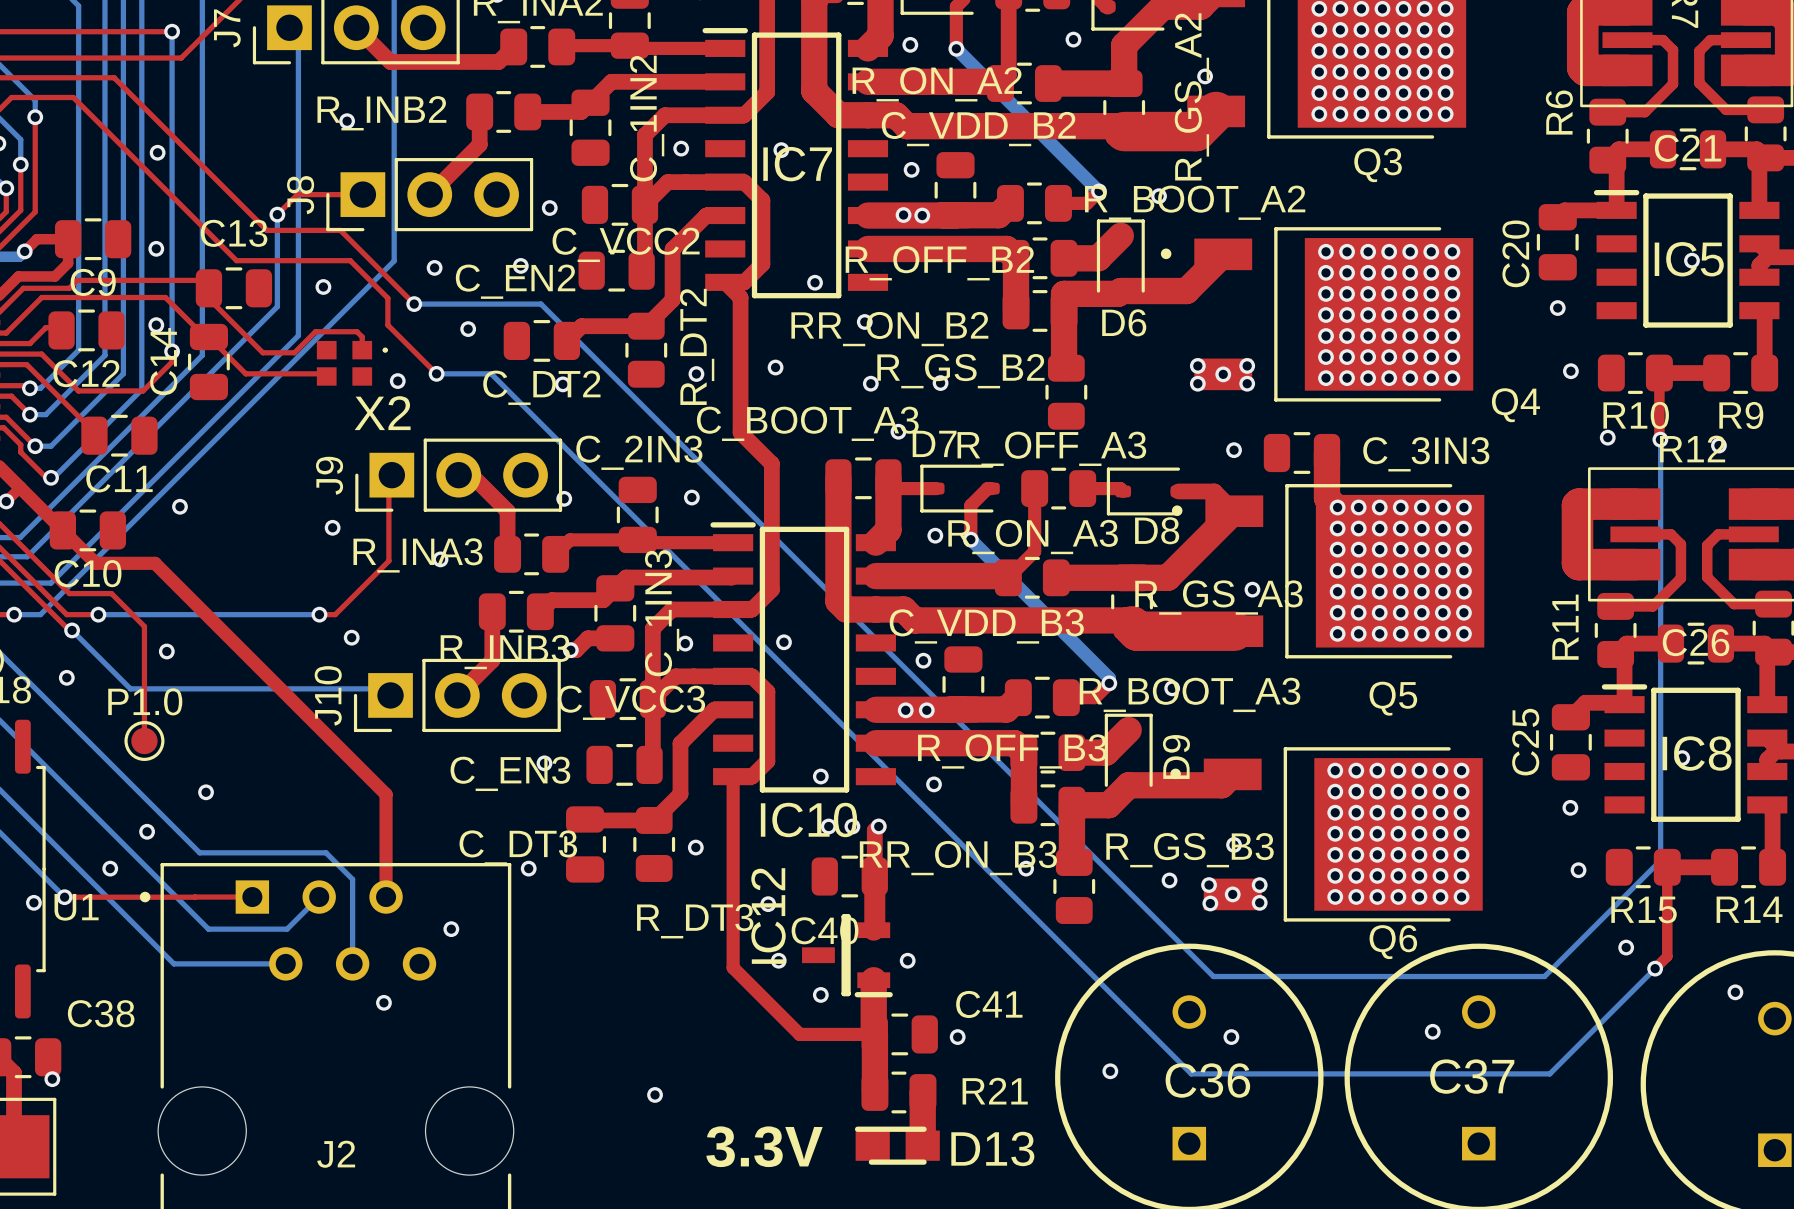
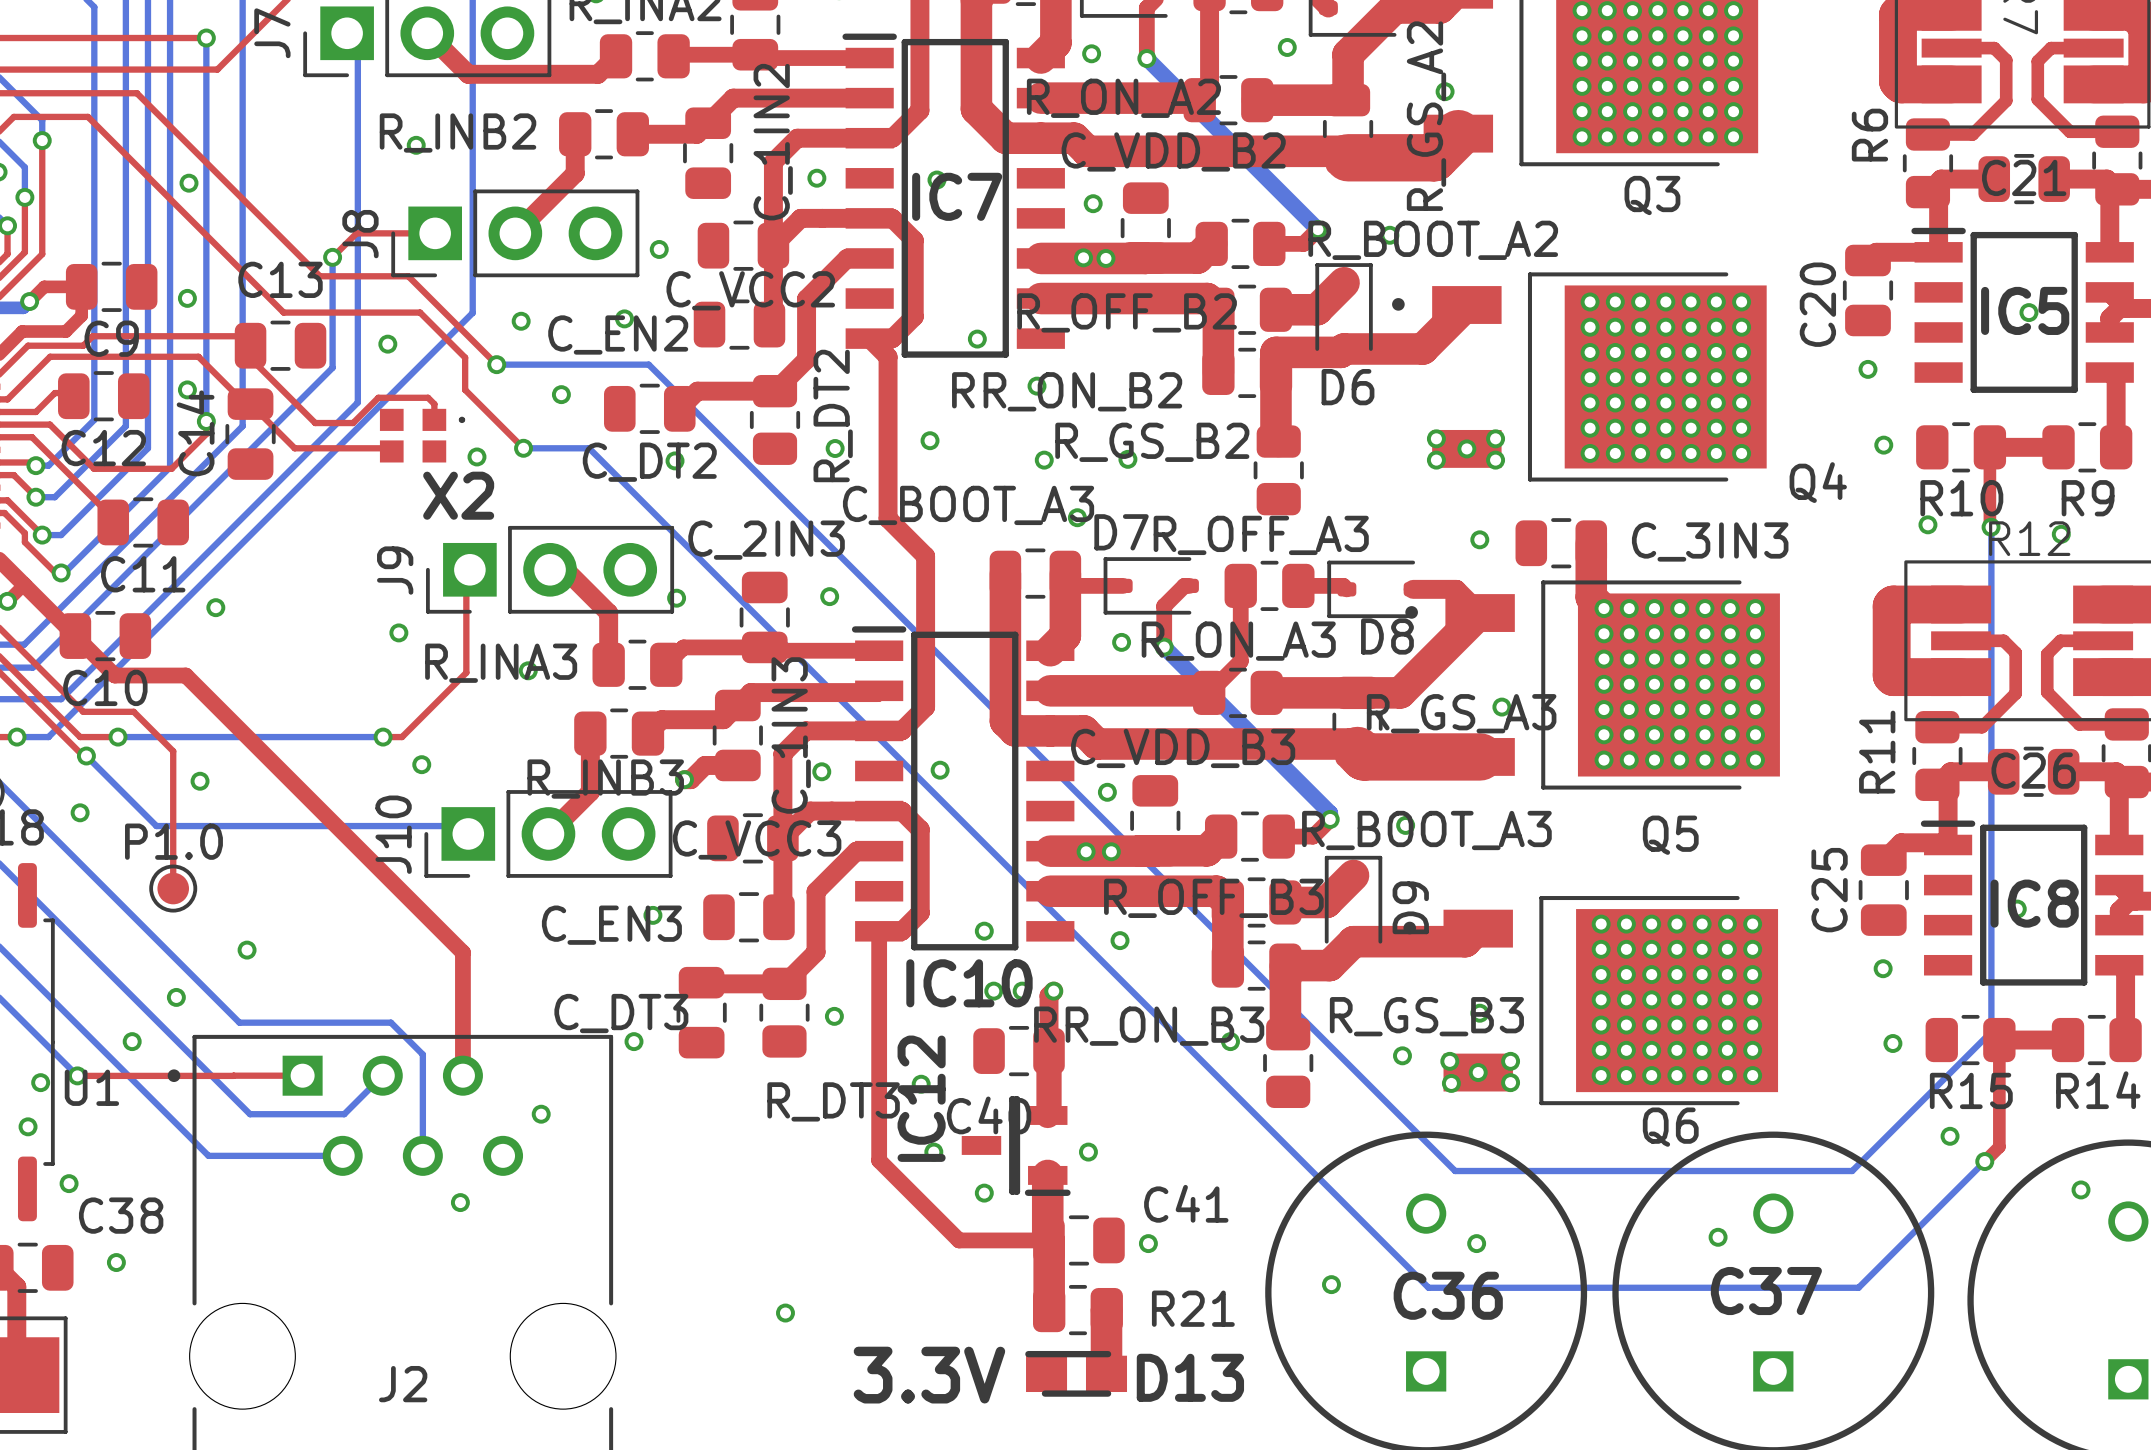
via: none -> (28, 1126)
via: none -> (69, 1183)
via: none -> (116, 1262)
via: (52, 1079) -> none

